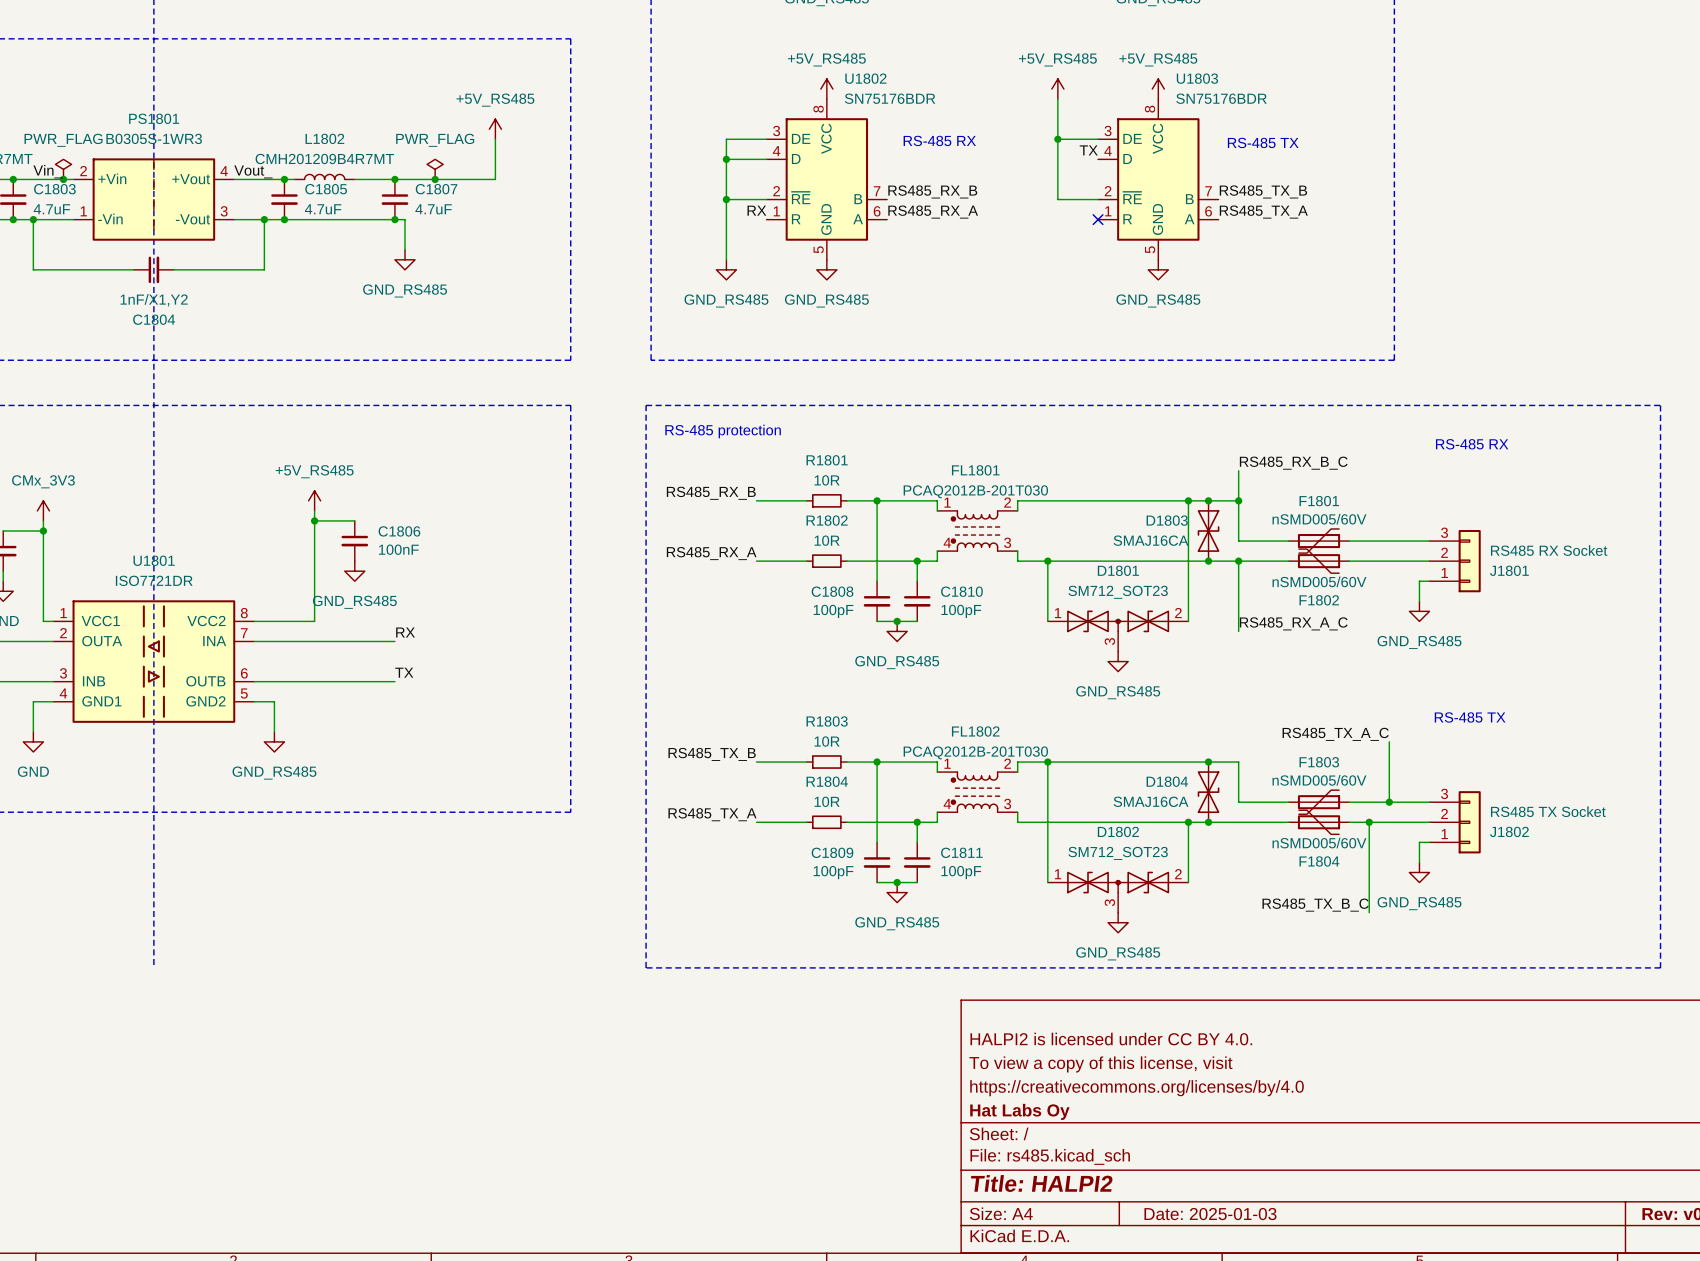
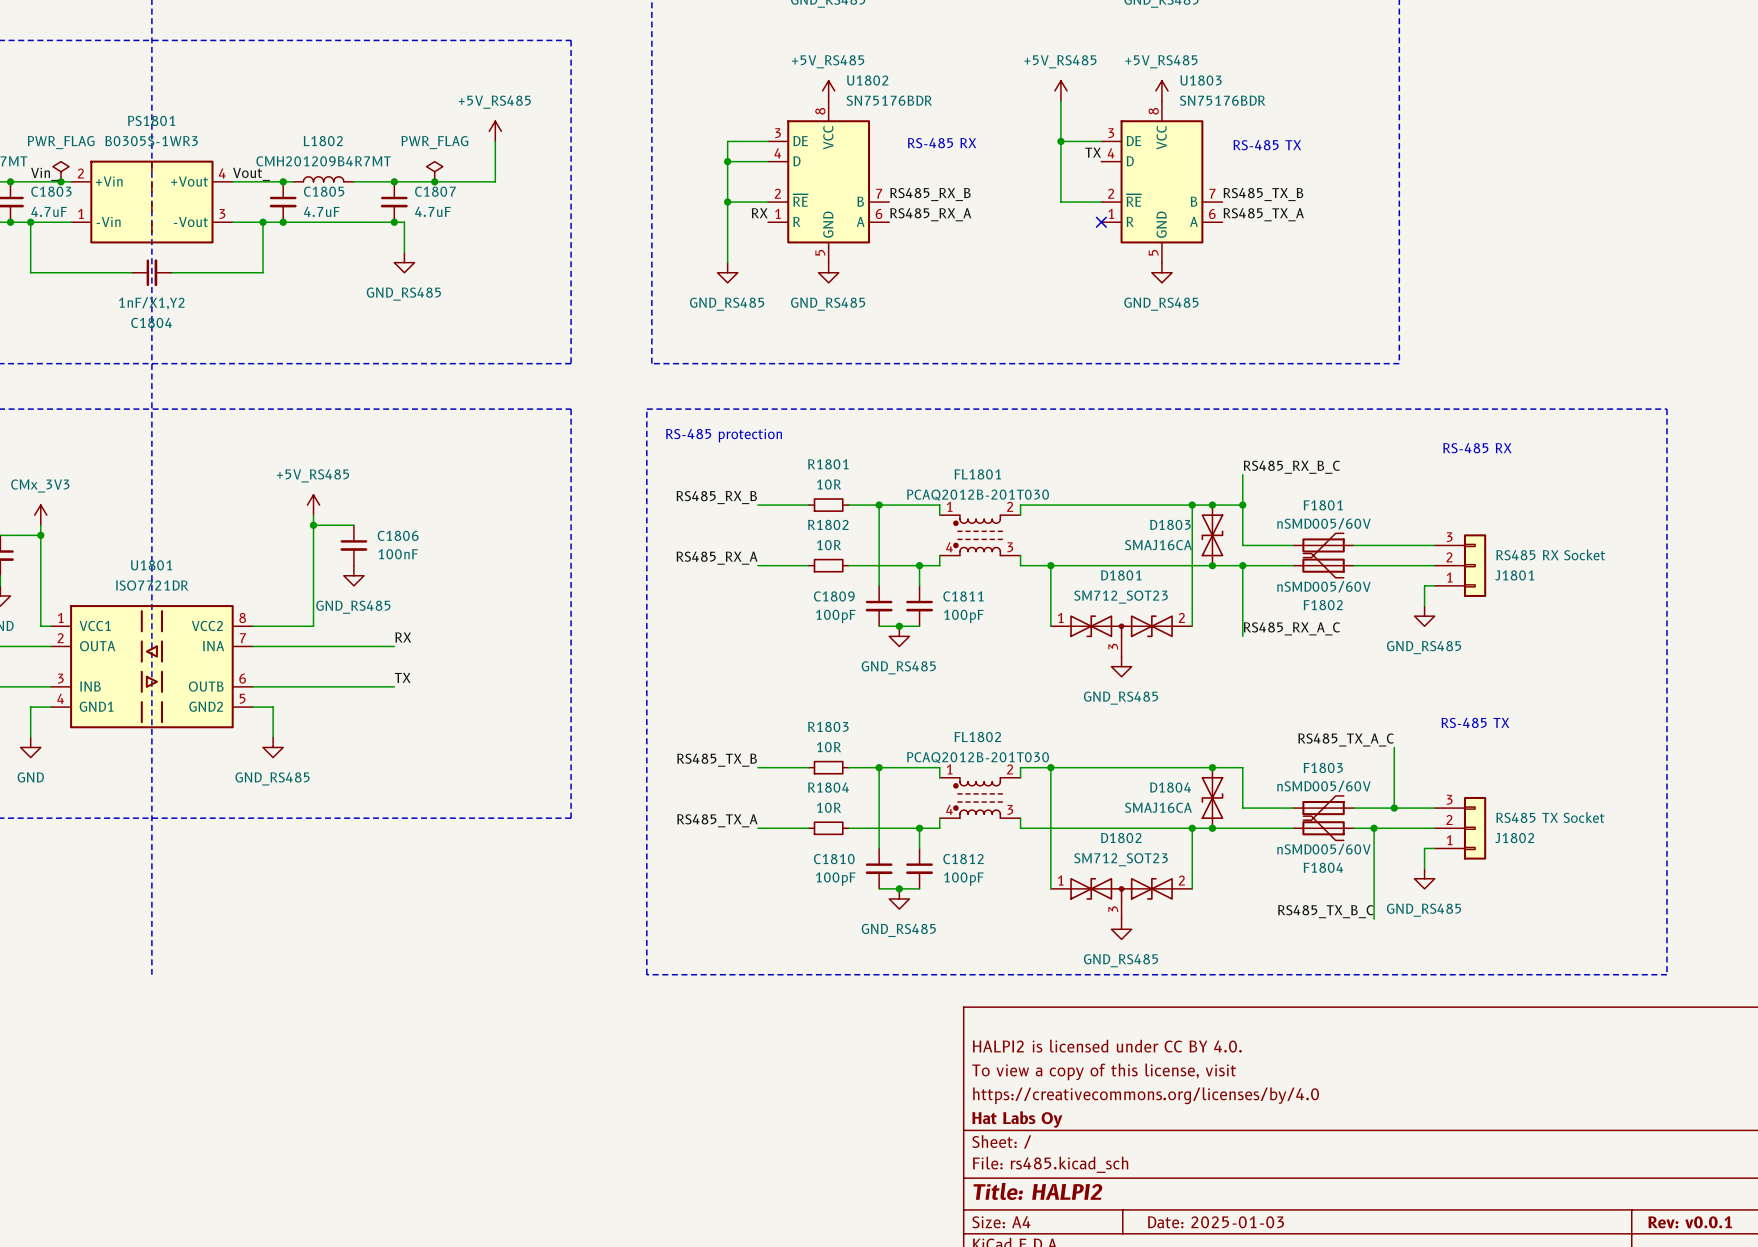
C1808 name: C1808 (832, 591) -> C1809 (834, 596)
C1810 name: C1810 (961, 591) -> C1811 (963, 596)
C1809 name: C1809 (832, 852) -> C1810 (834, 859)
C1811 name: C1811 (961, 852) -> C1812 (963, 859)

